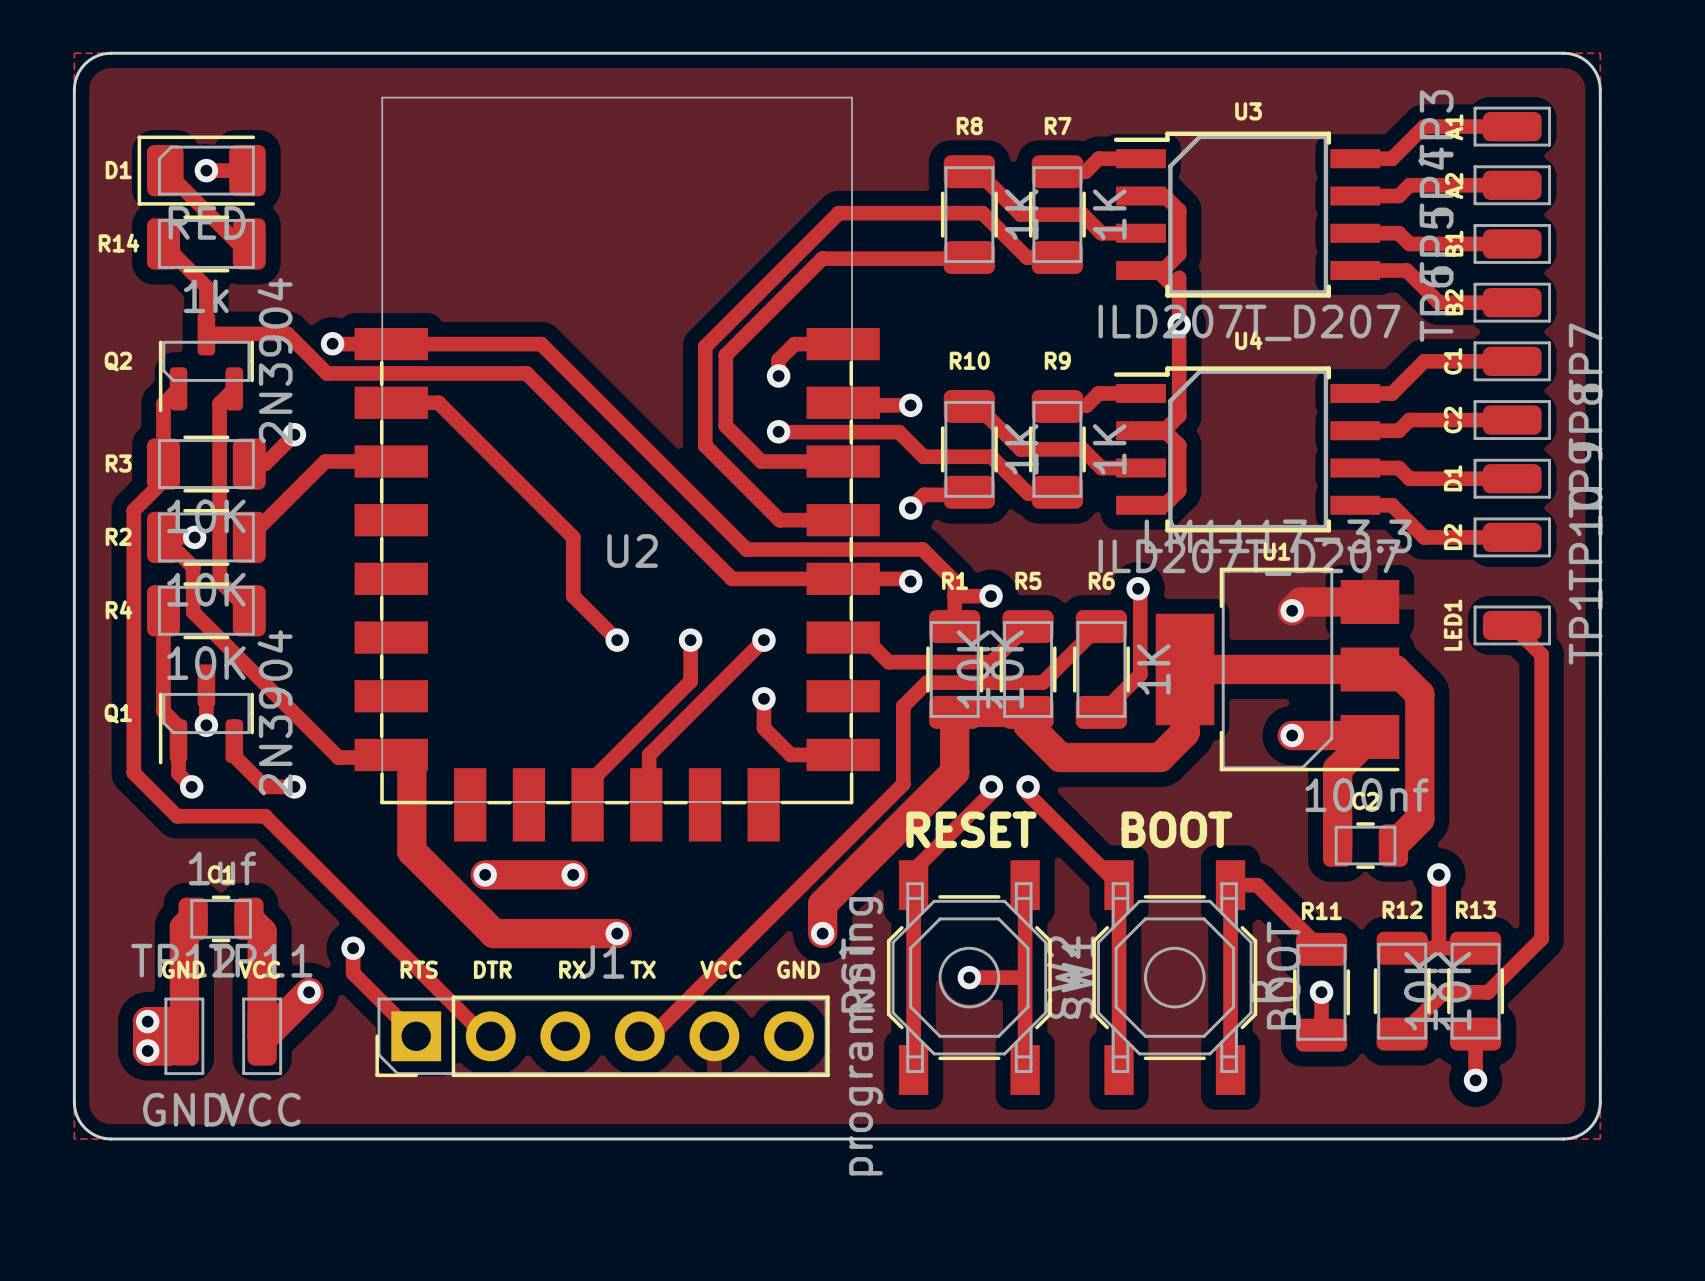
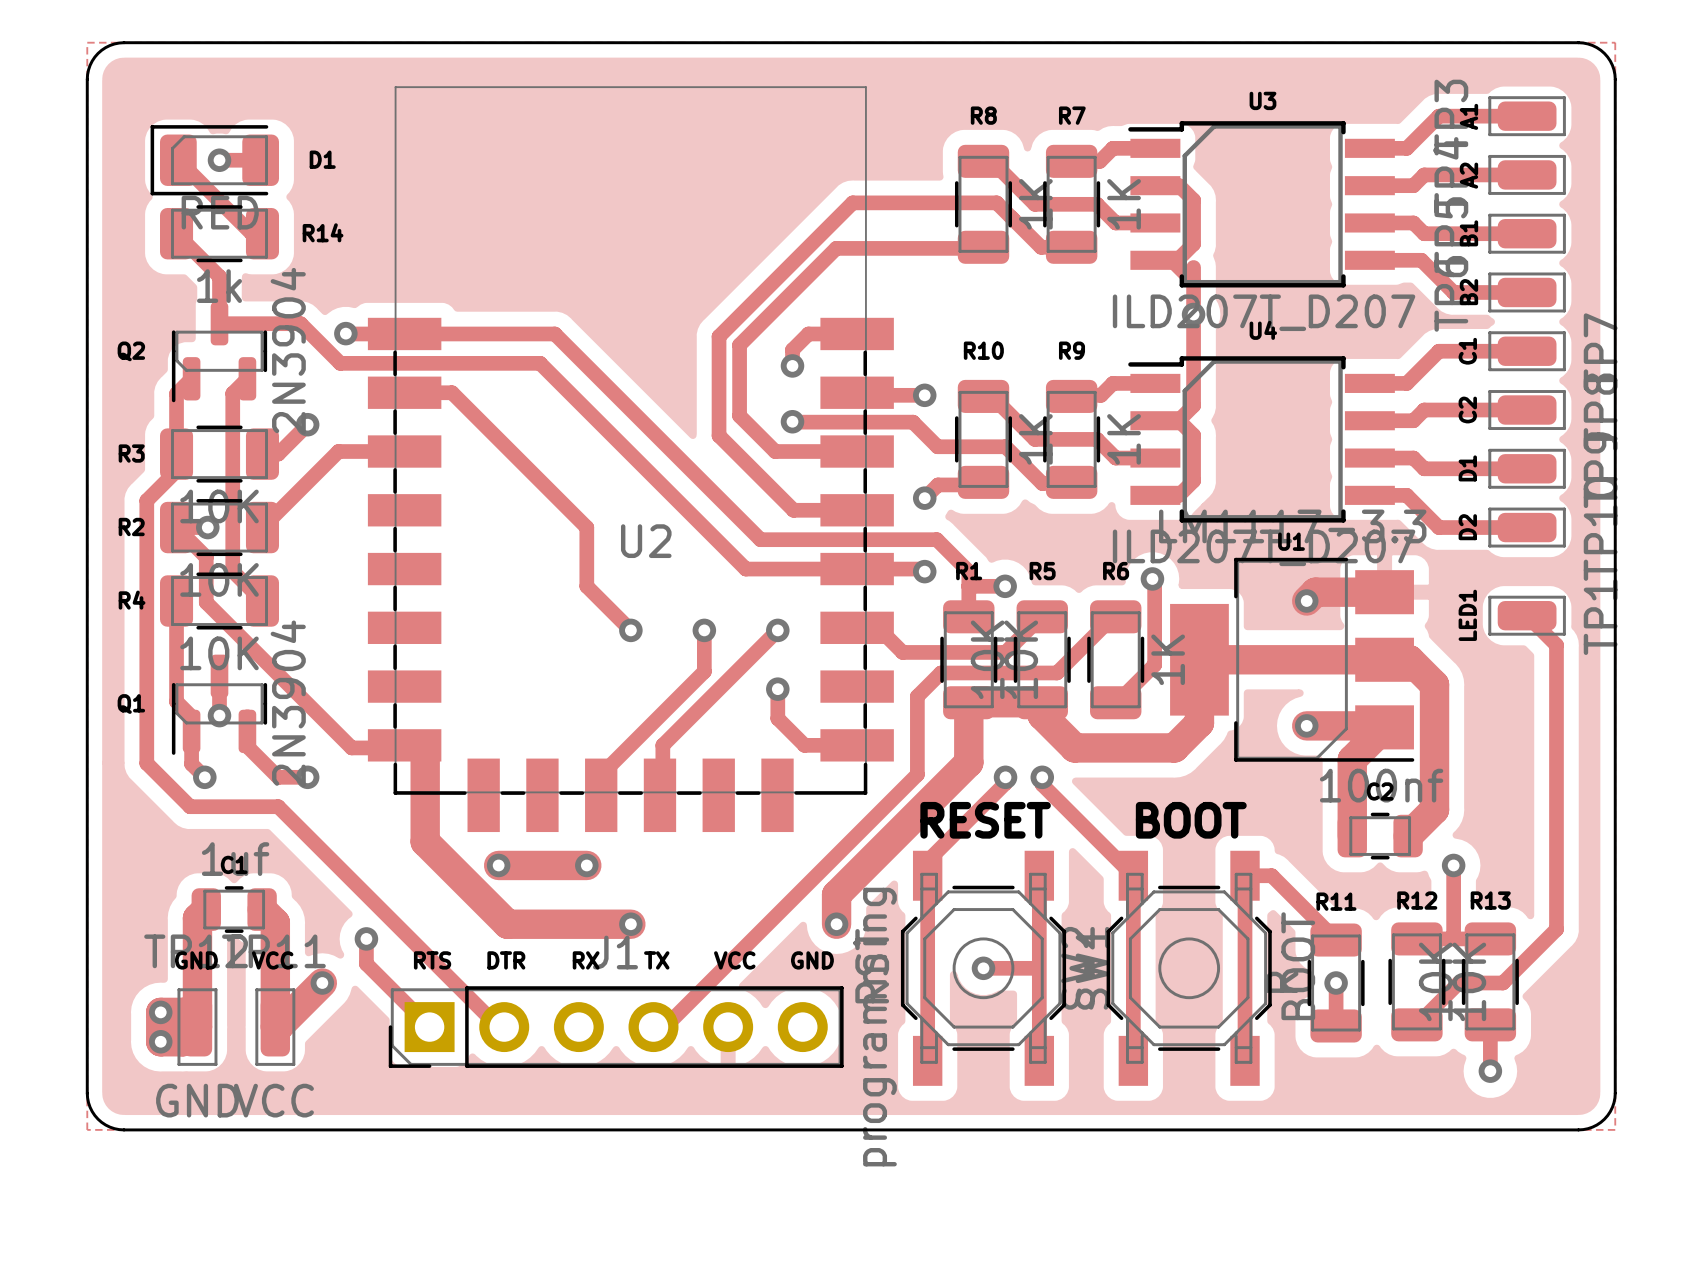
D1 name position: D1 (118, 170) -> D1 (322, 159)
R14 name position: R14 (119, 243) -> R14 (323, 232)

